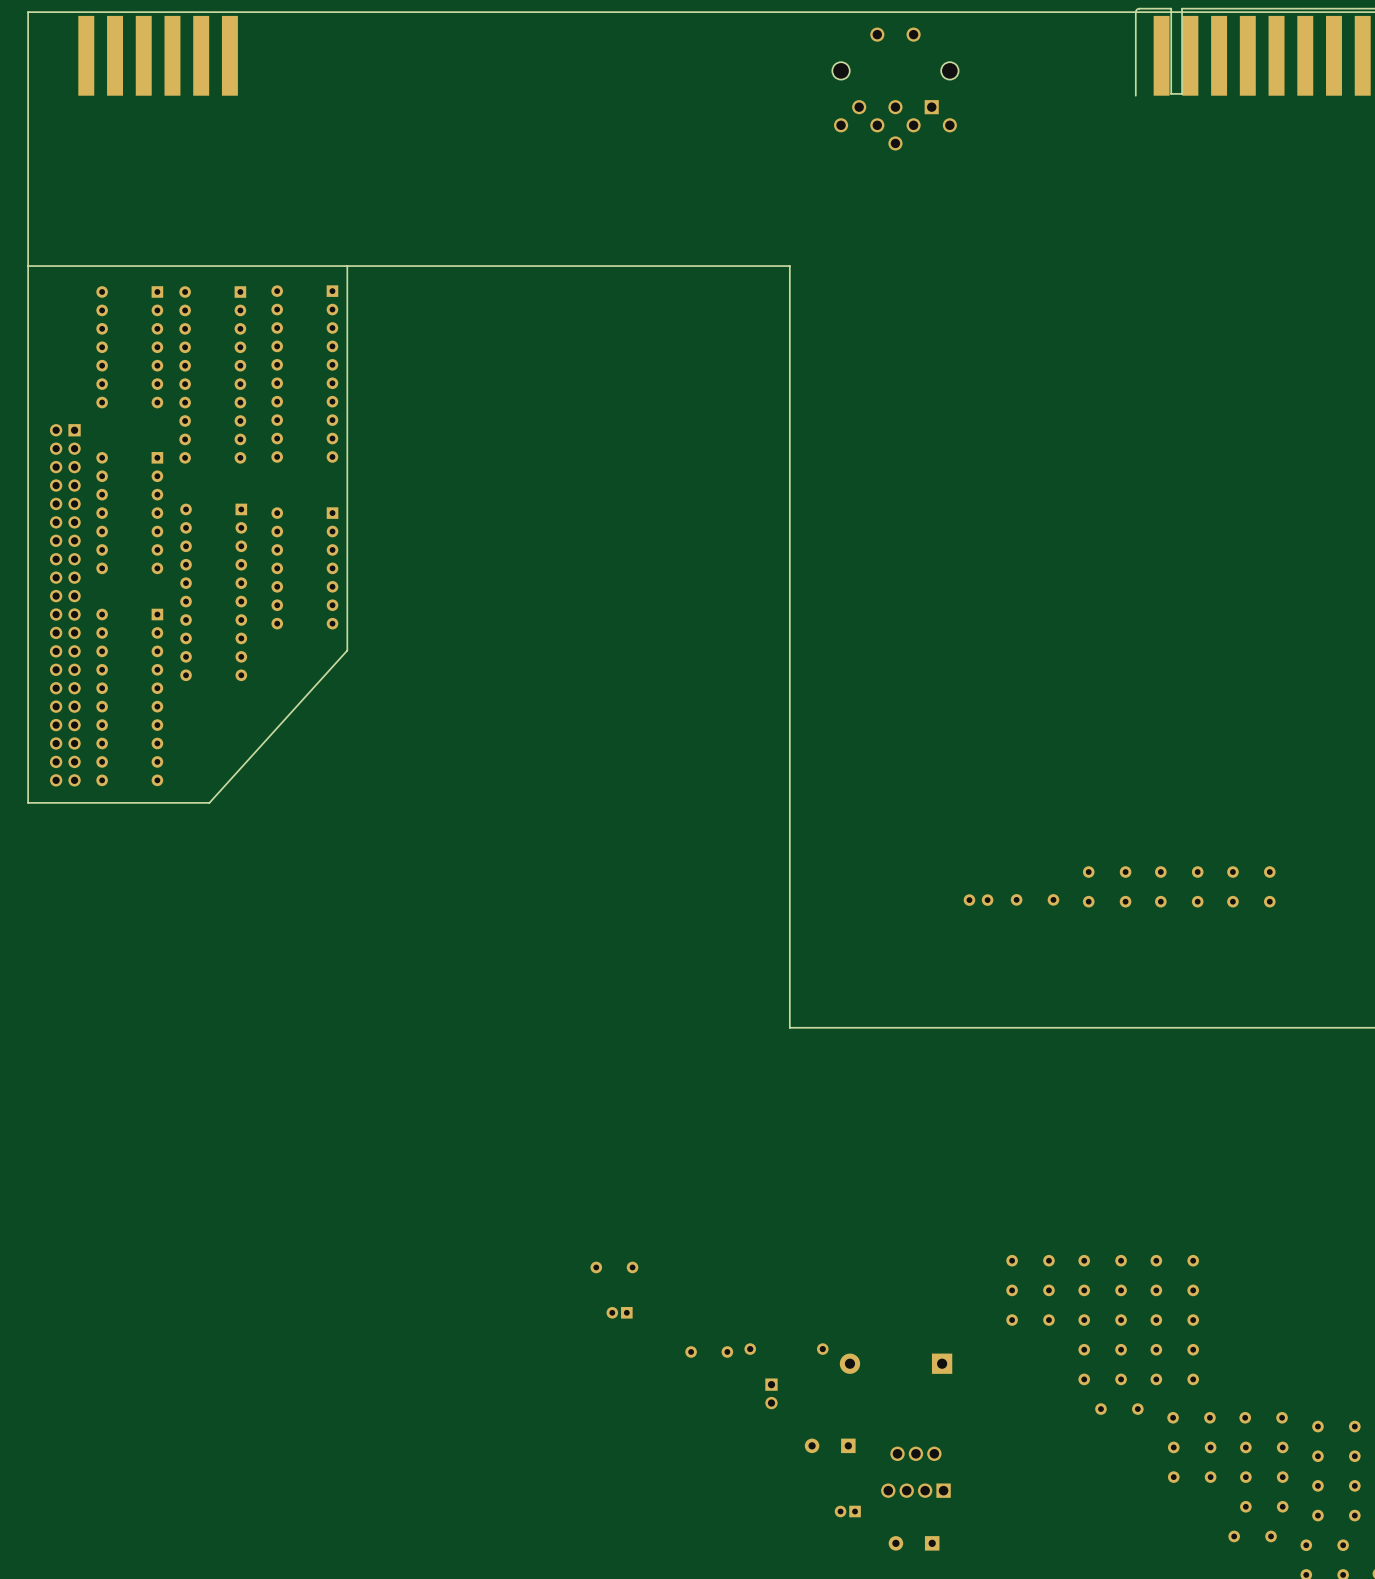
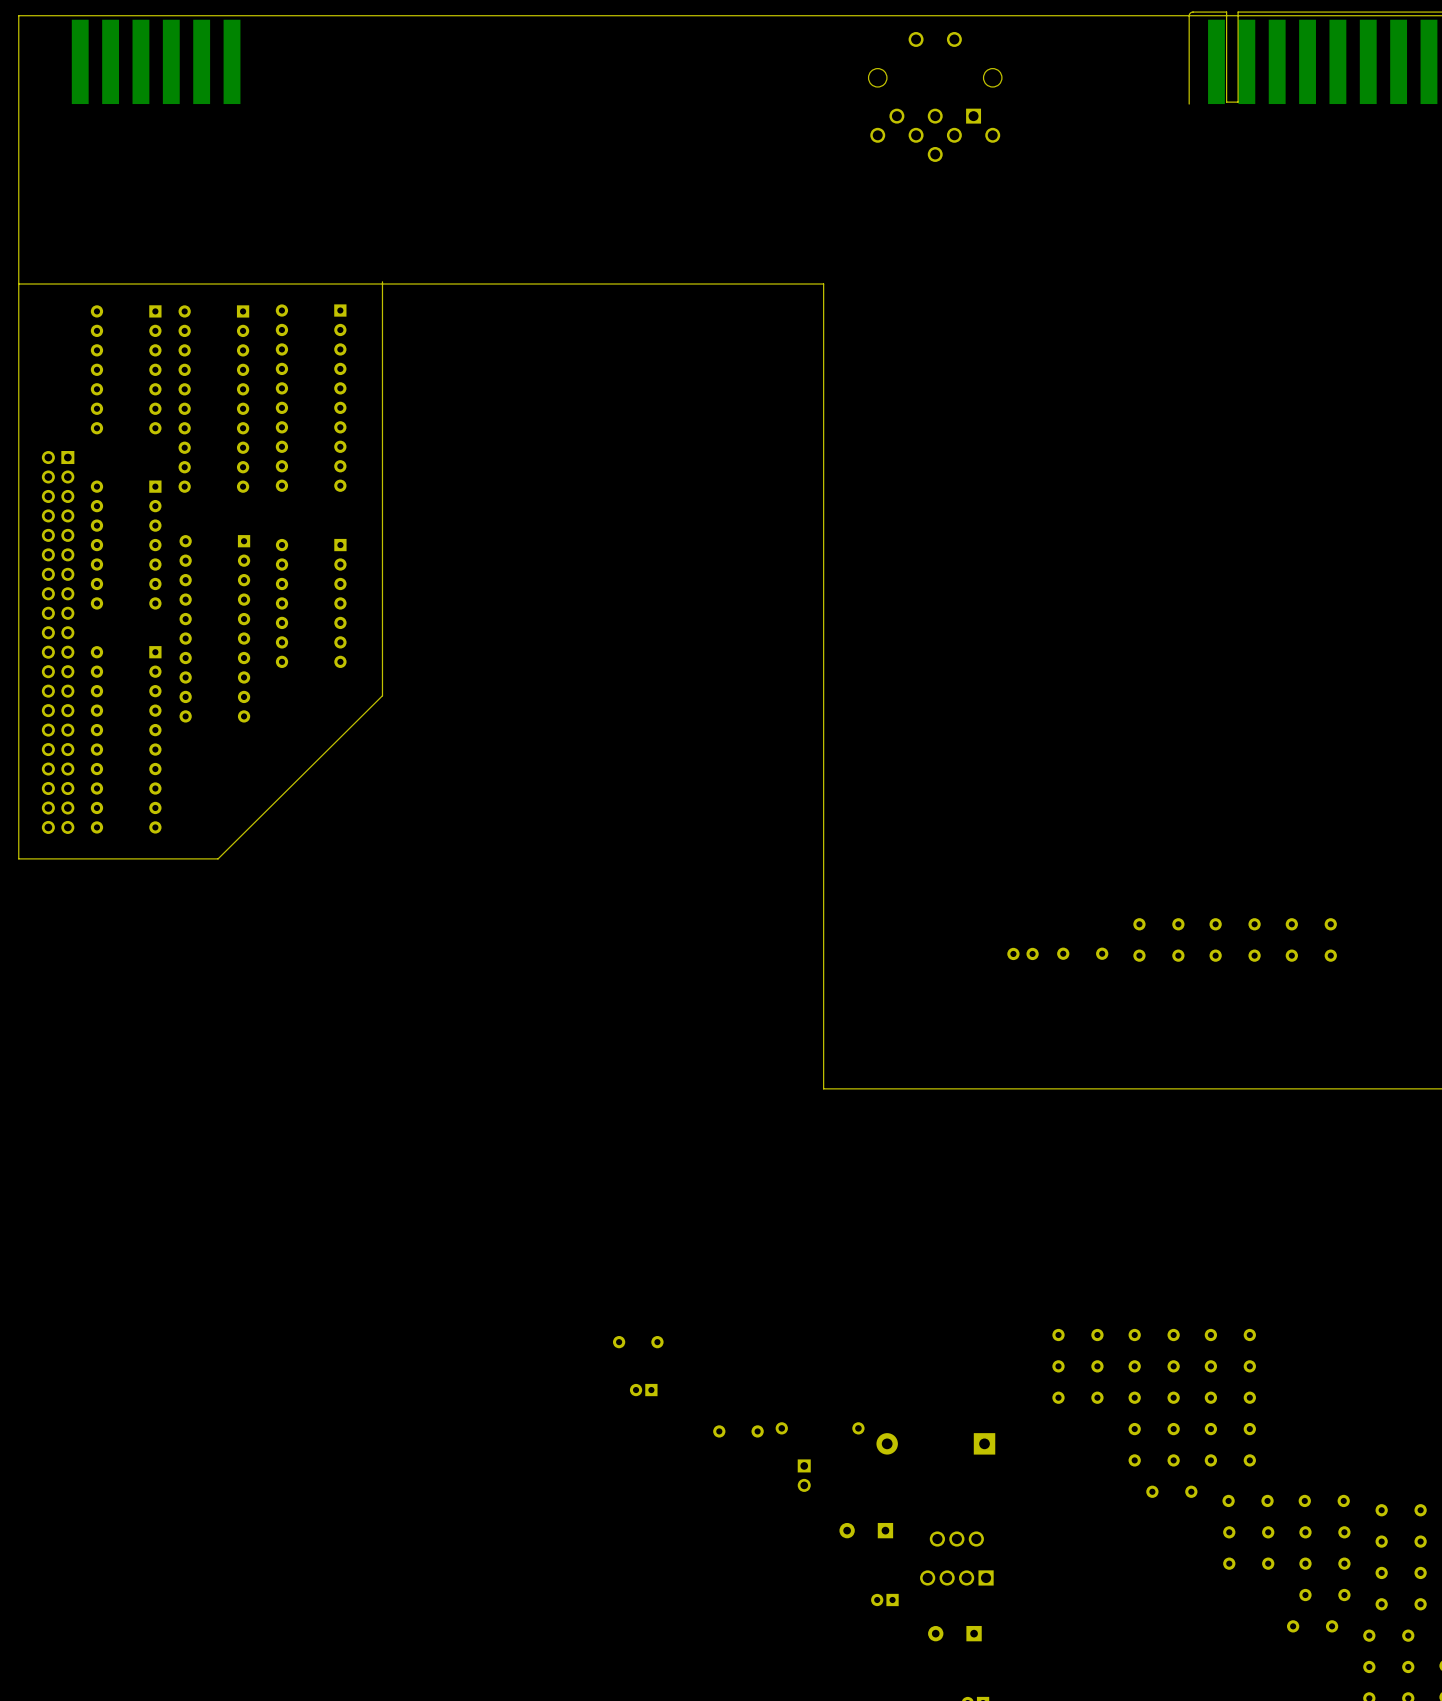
board edge: (347, 266) (347, 650) (209, 802) (28, 802) -> (382, 281) (382, 695) (218, 858) (18, 858) (18, 851)

